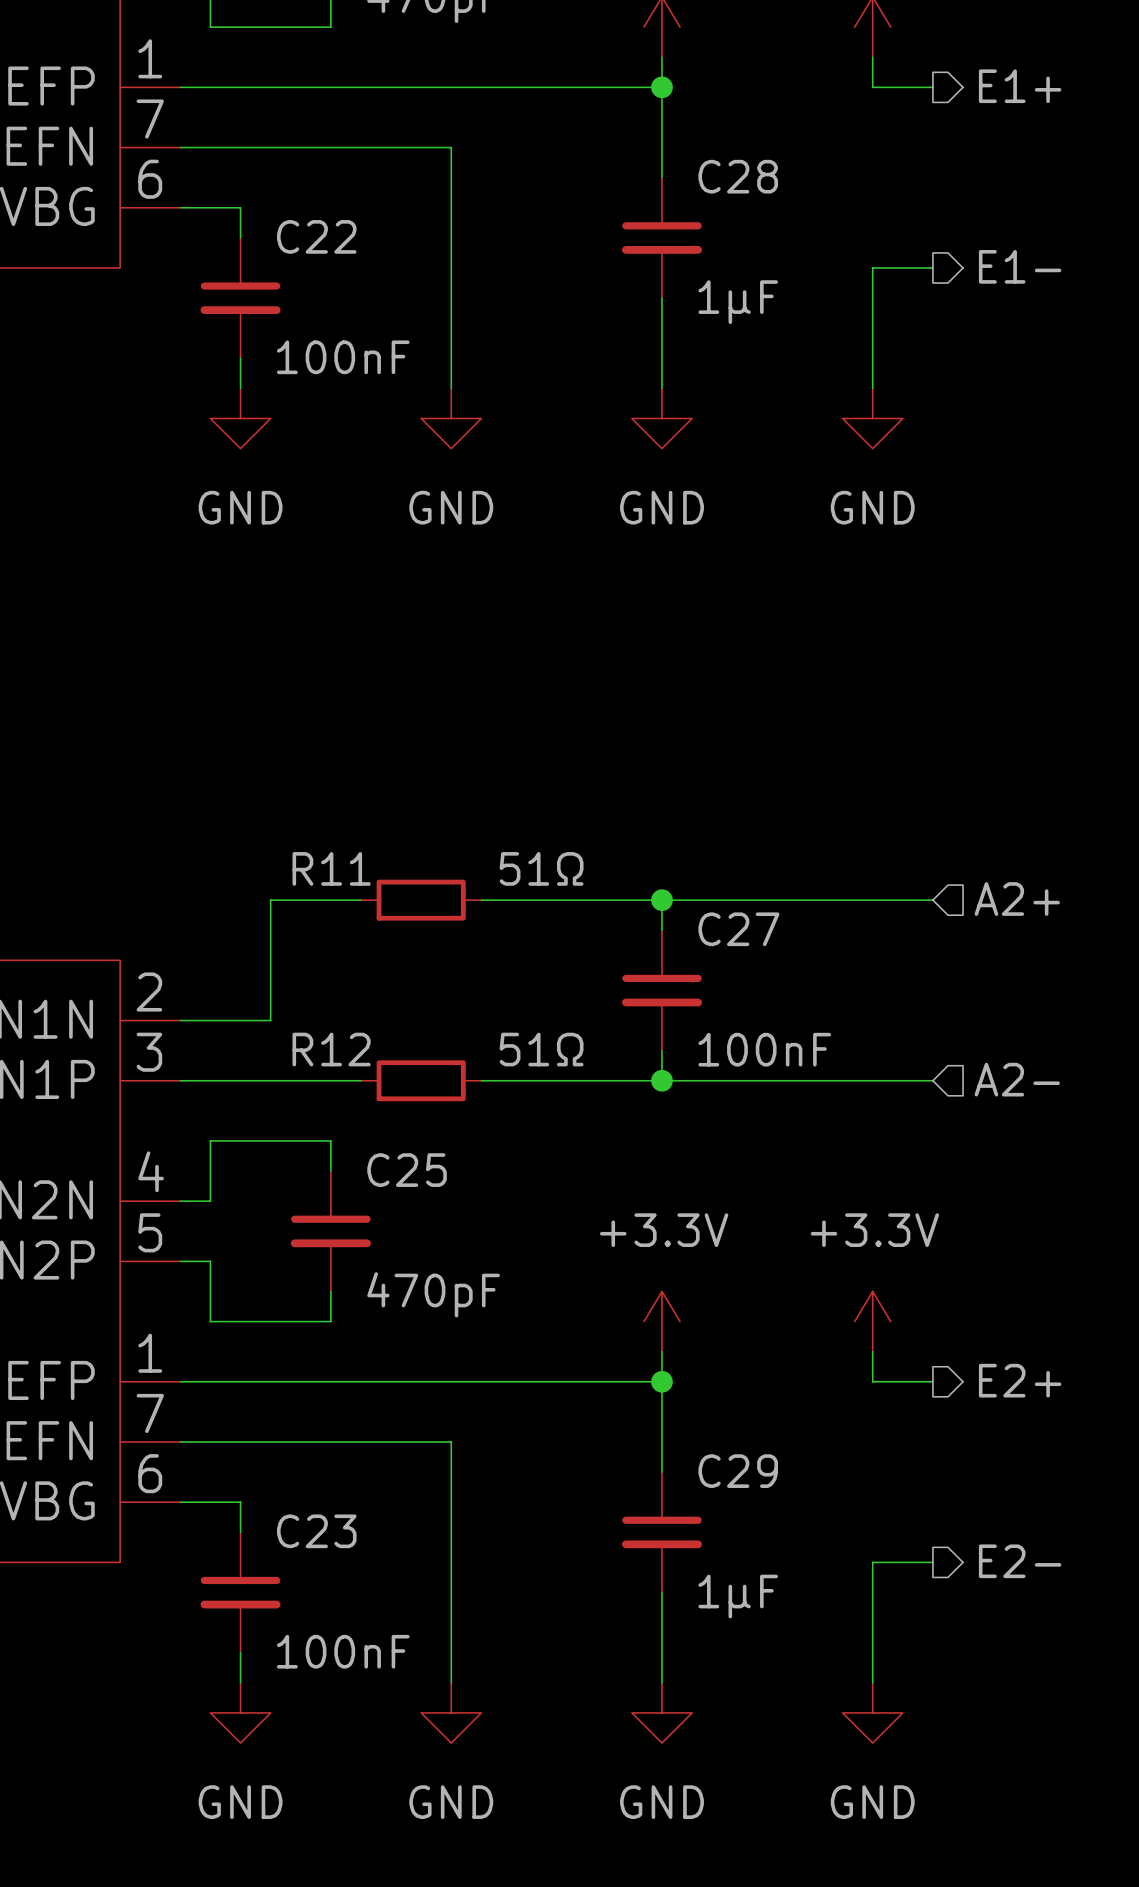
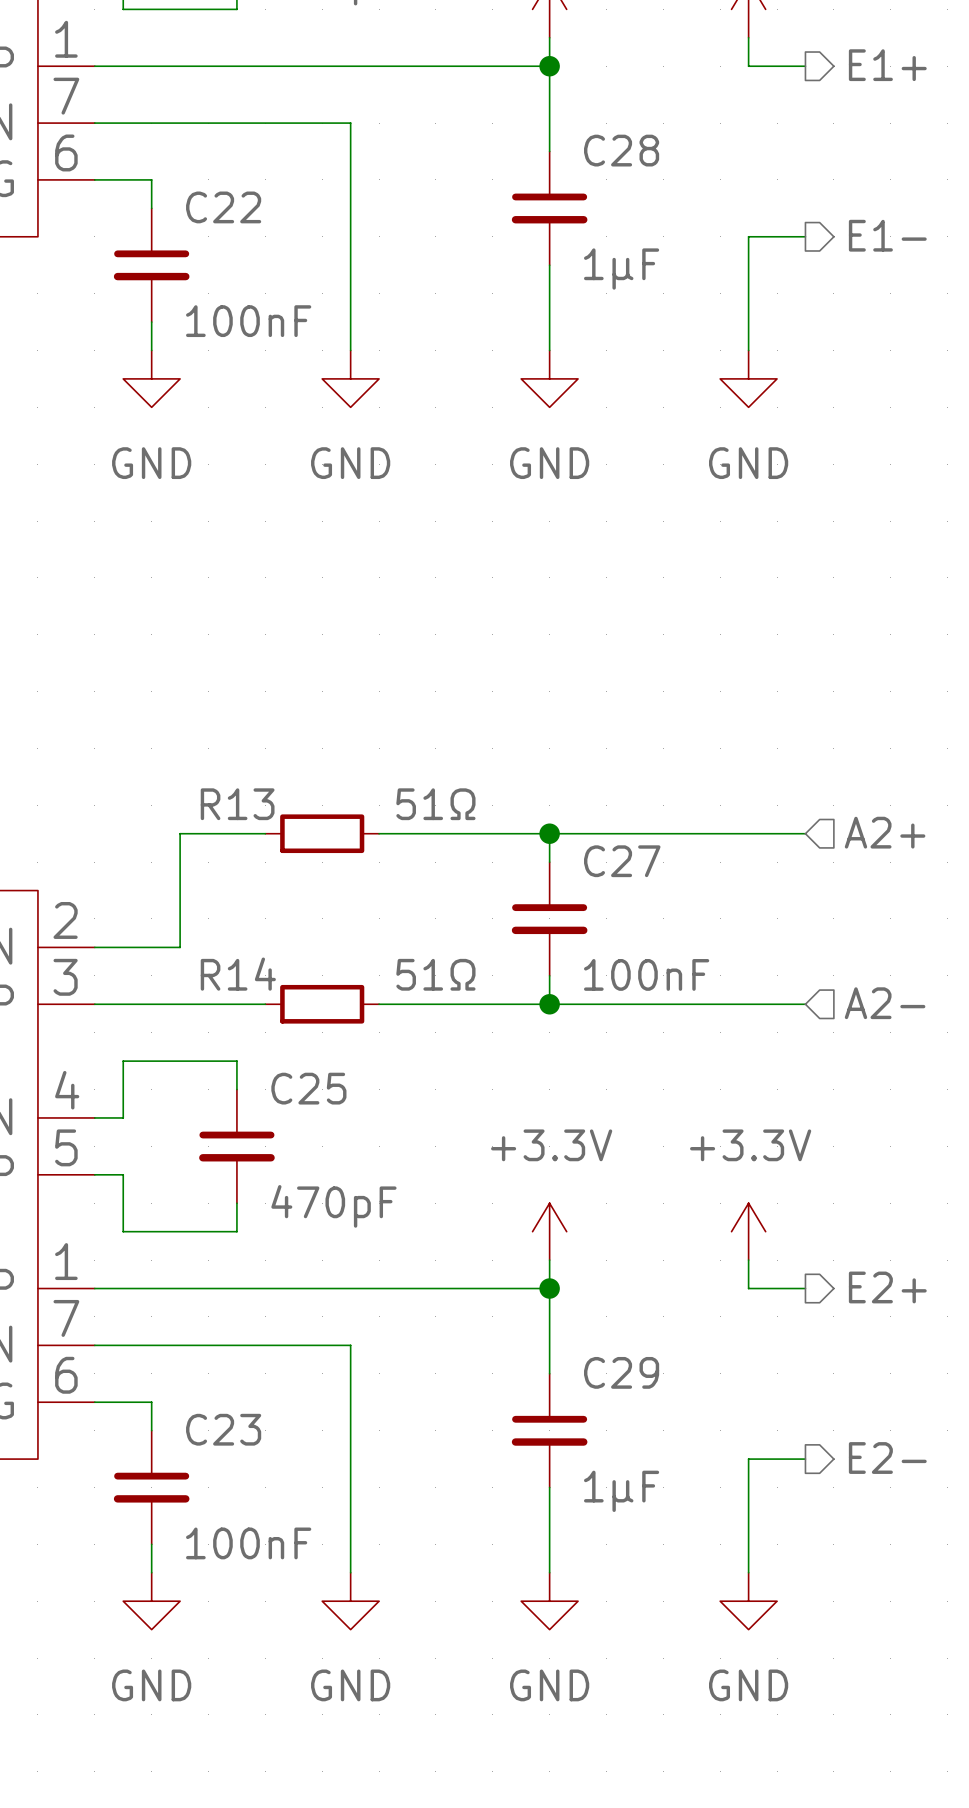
R11 name: R11 (331, 868) -> R13 (237, 804)
R12 name: R12 (331, 1049) -> R14 (238, 974)

